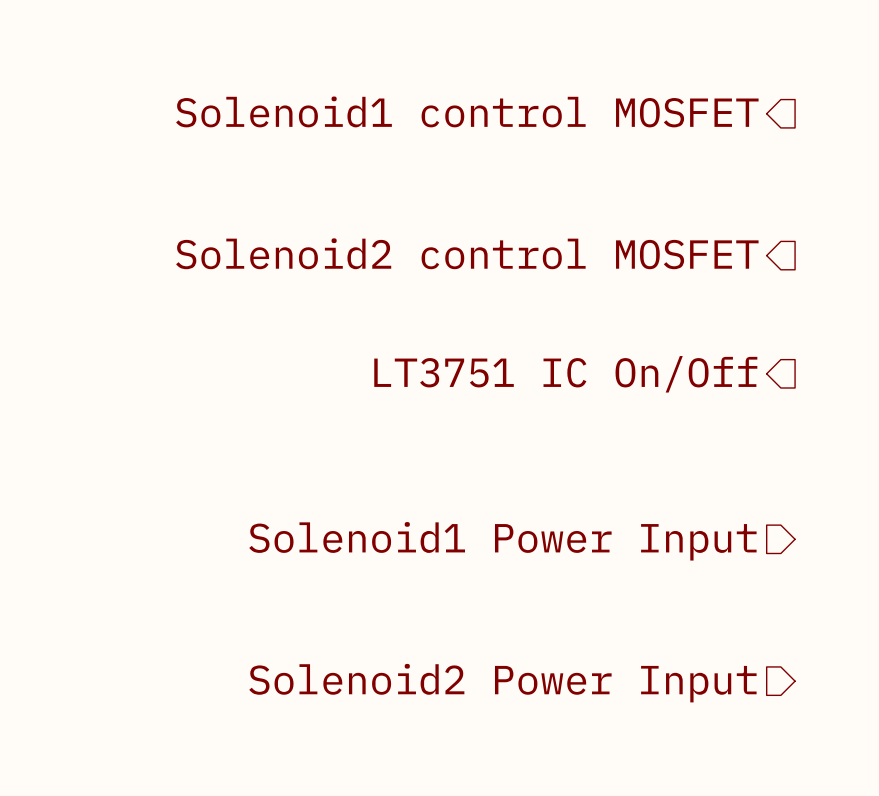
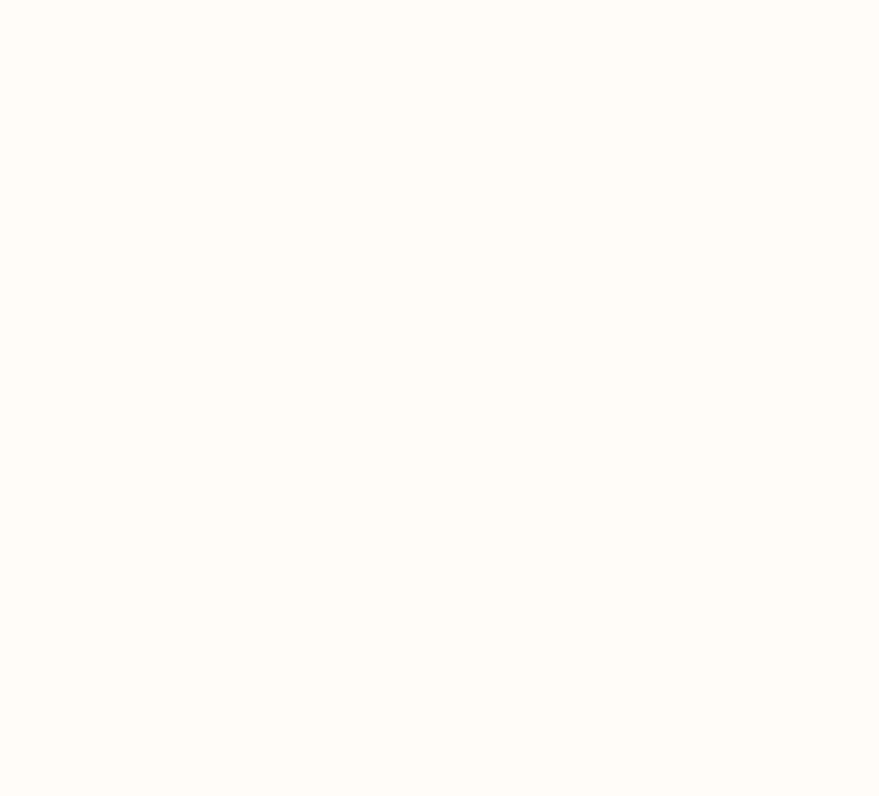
hierarchical label: Solenoid1 control MOSFET (467, 111) -> none
hierarchical label: Solenoid2 control MOSFET (467, 253) -> none
hierarchical label: LT3751 IC On/Off (565, 374) -> none
hierarchical label: Solenoid1 Power Input (502, 541) -> none
hierarchical label: Solenoid2 Power Input (502, 683) -> none

